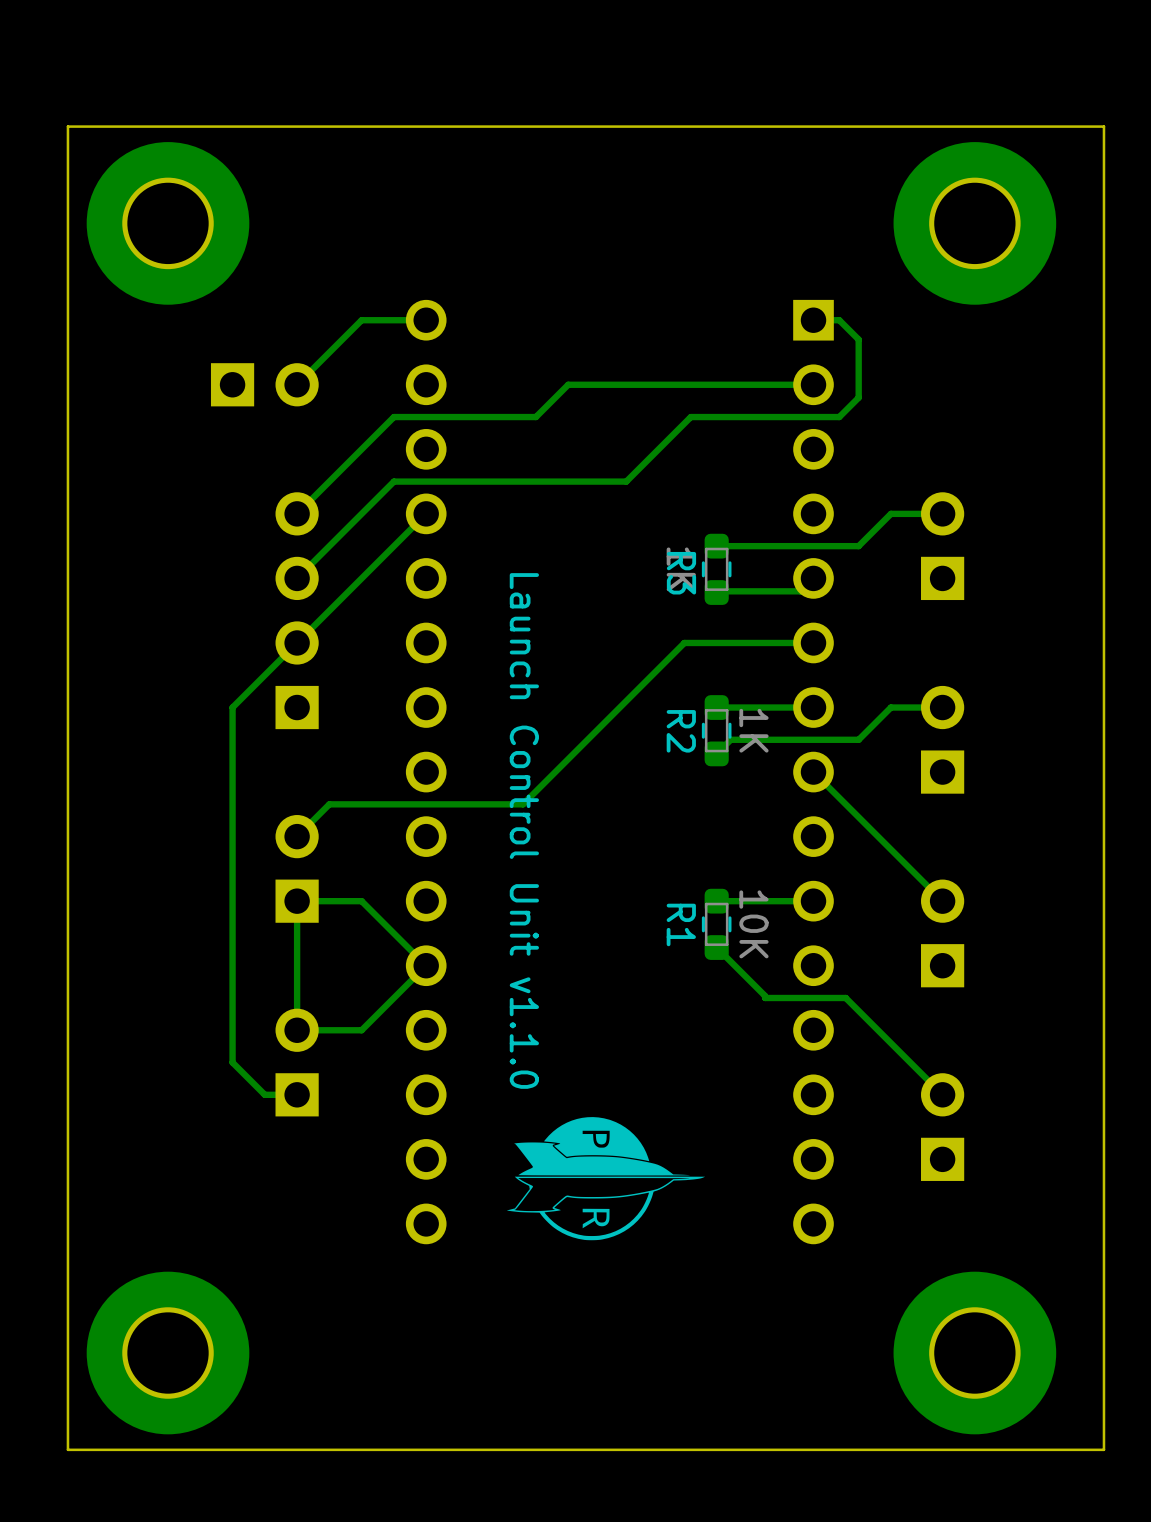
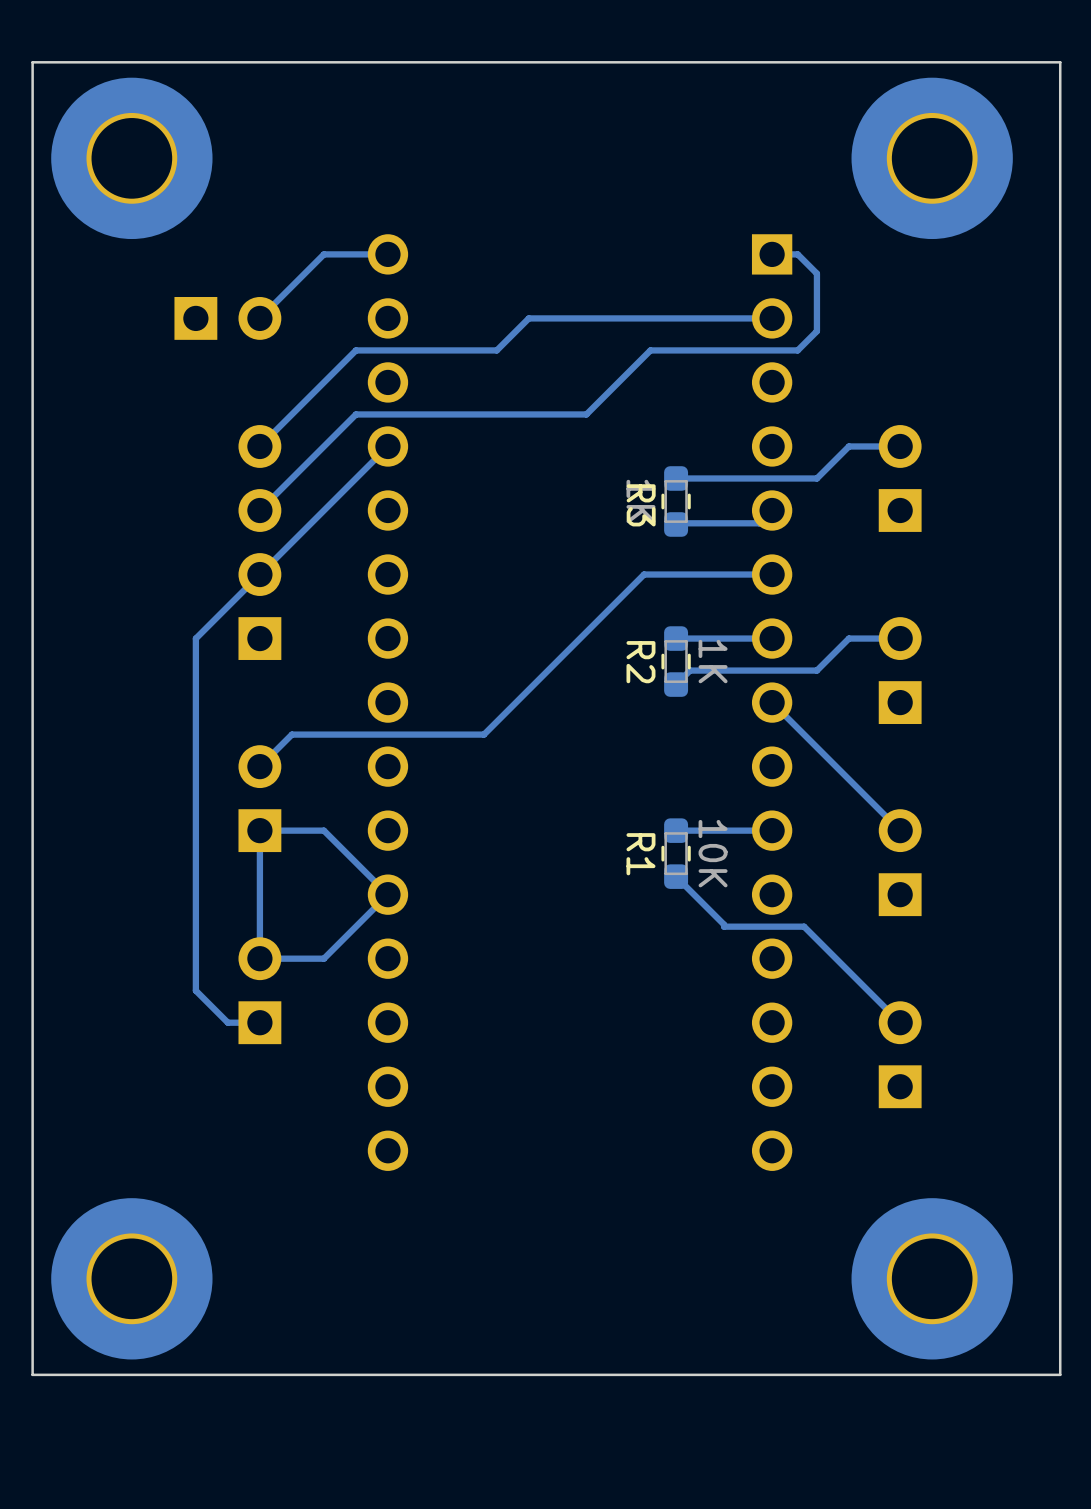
text: Launch Control Unit v1.1.0 (524, 830) -> none
drawing: [506, 1117, 706, 1241] -> none

